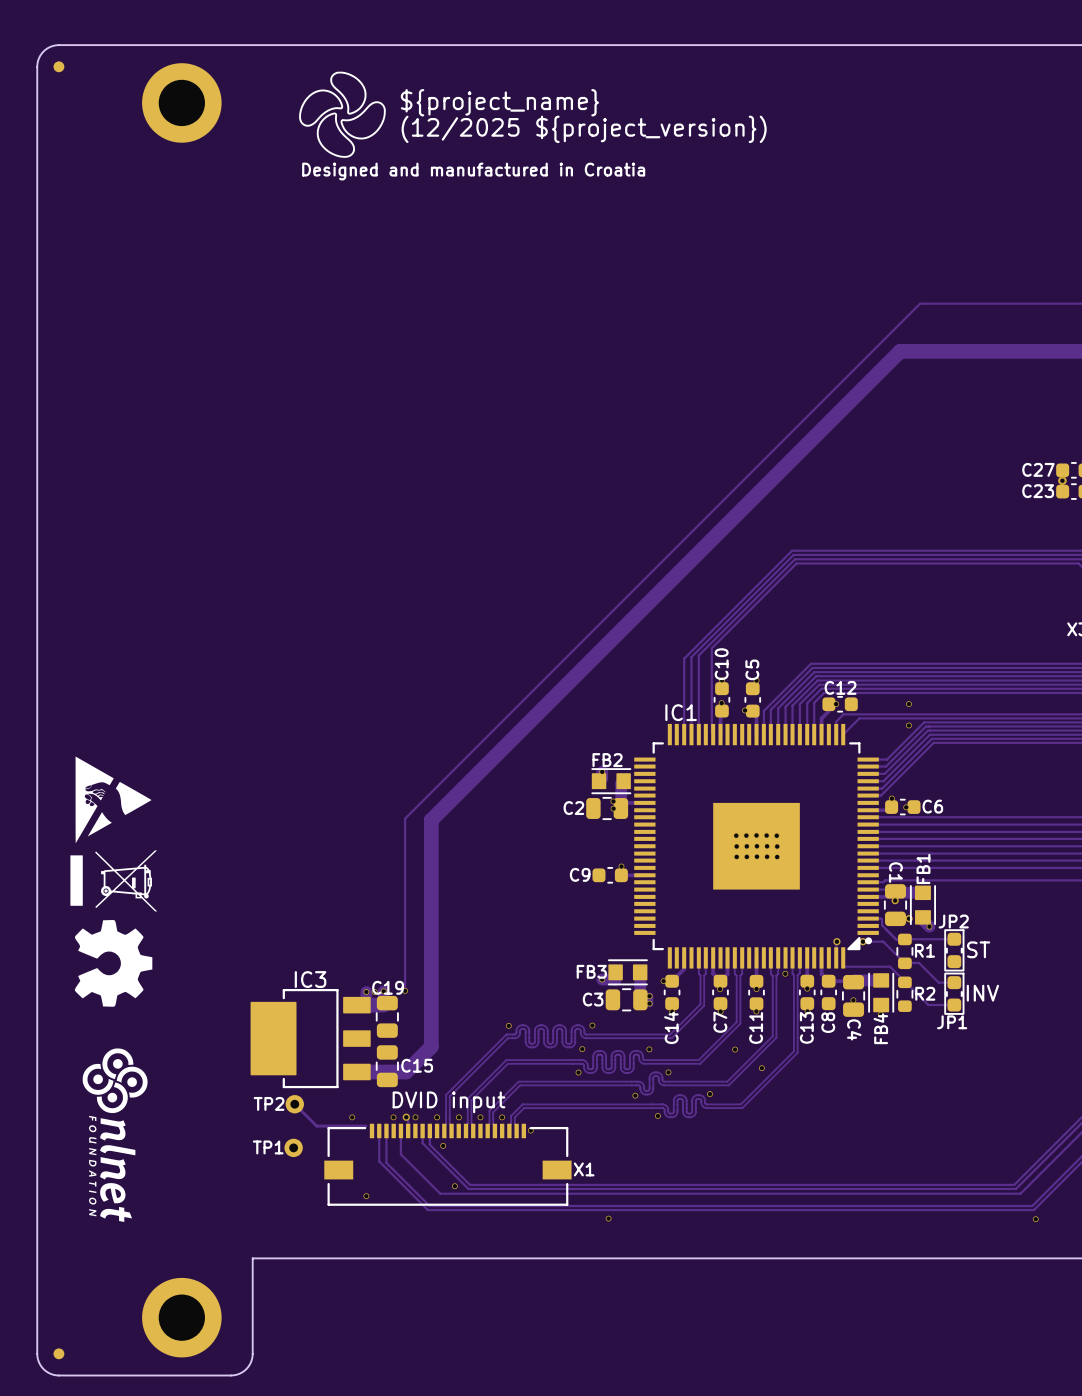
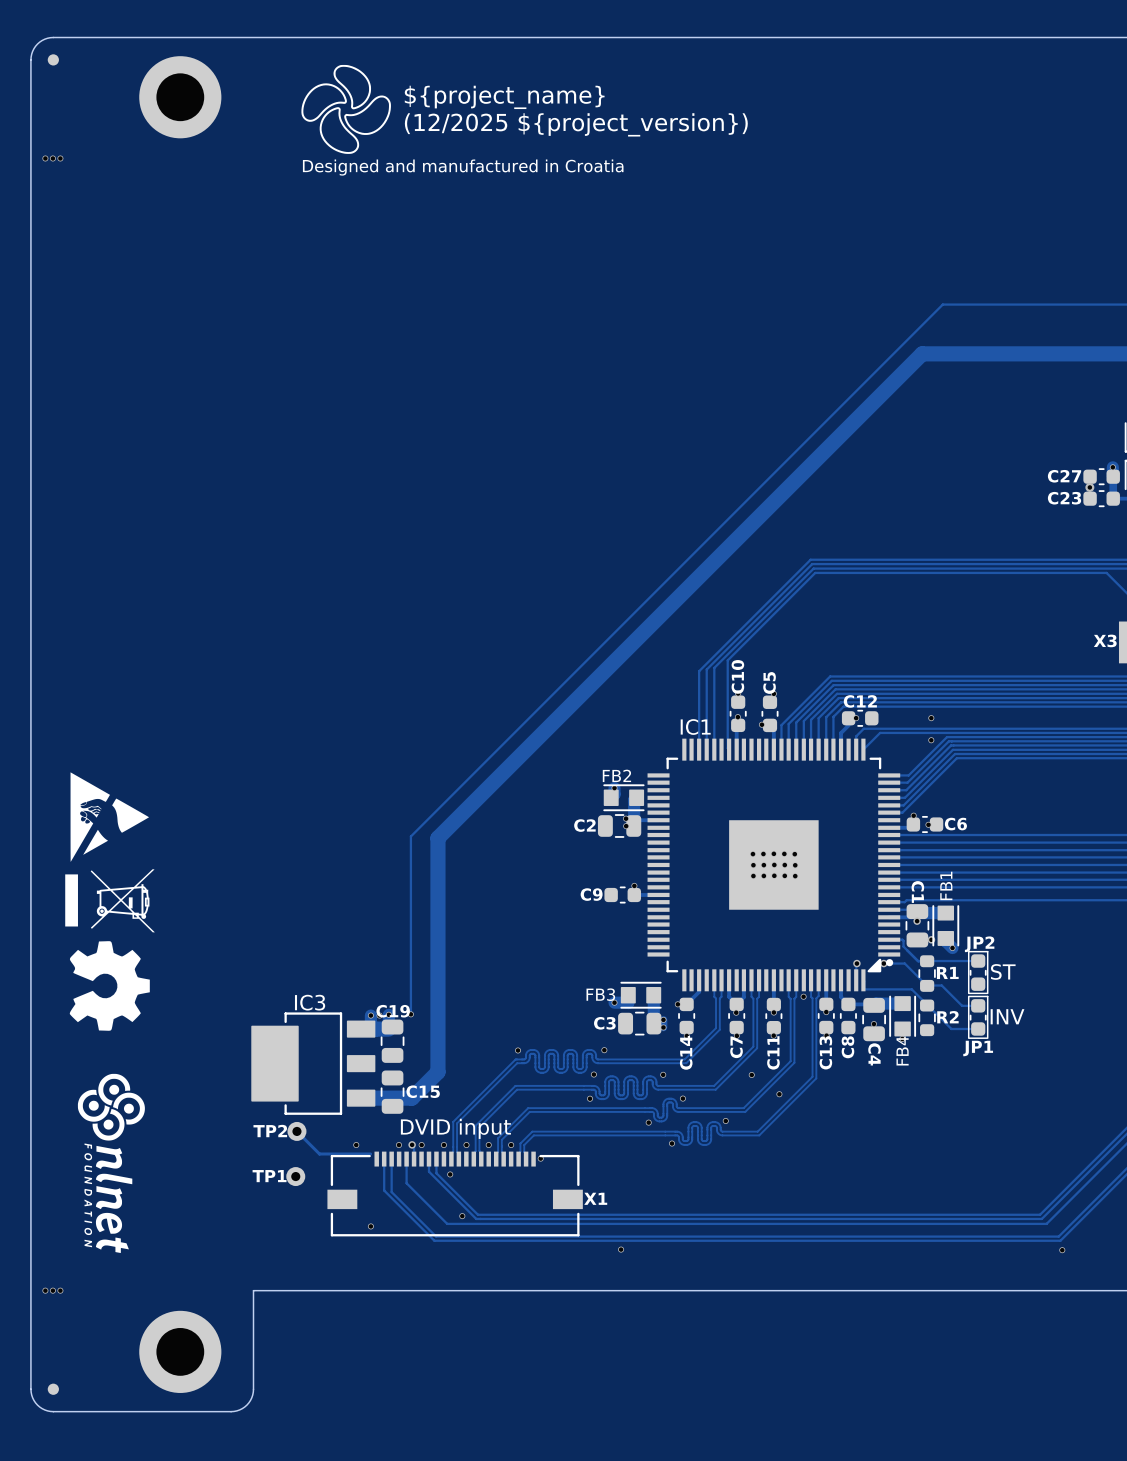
via: none -> (45, 158)
via: none -> (52, 158)
via: none -> (60, 158)
via: none -> (45, 1290)
via: none -> (52, 1290)
via: none -> (60, 1290)

